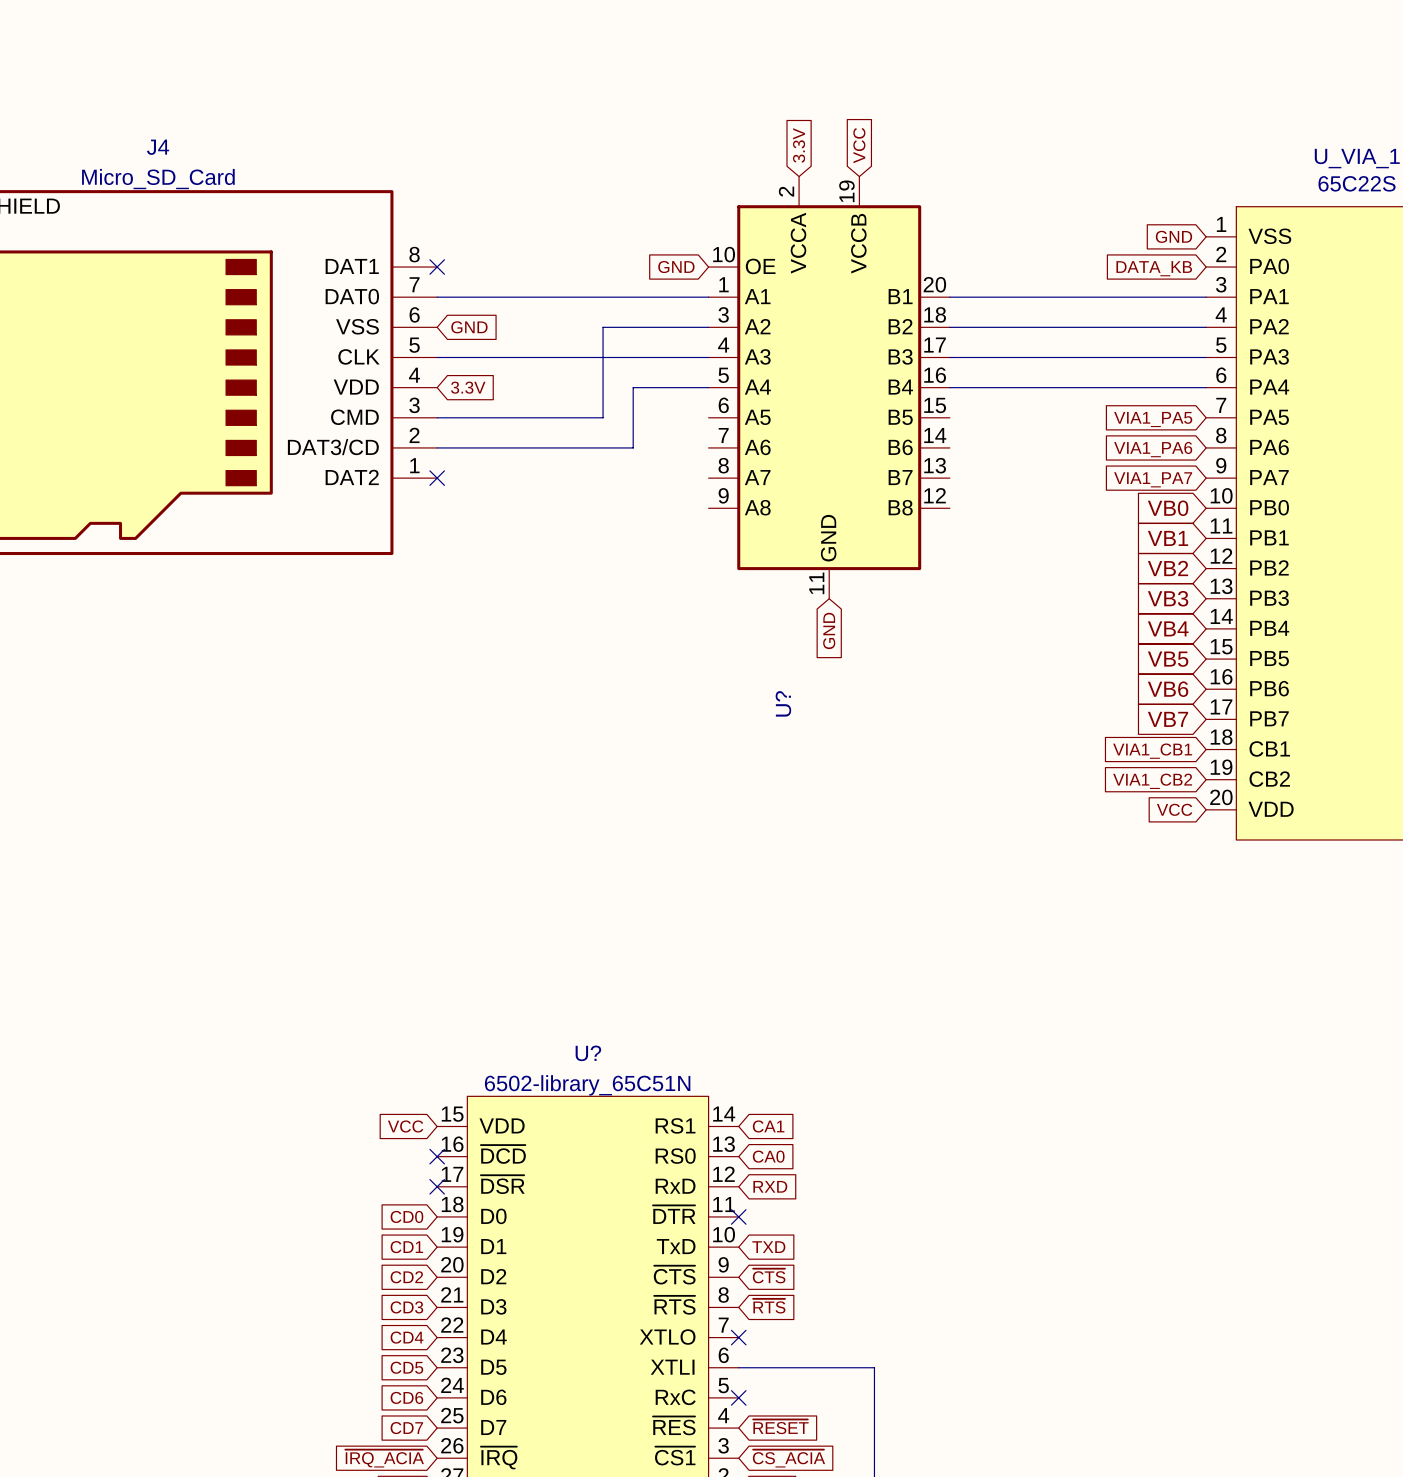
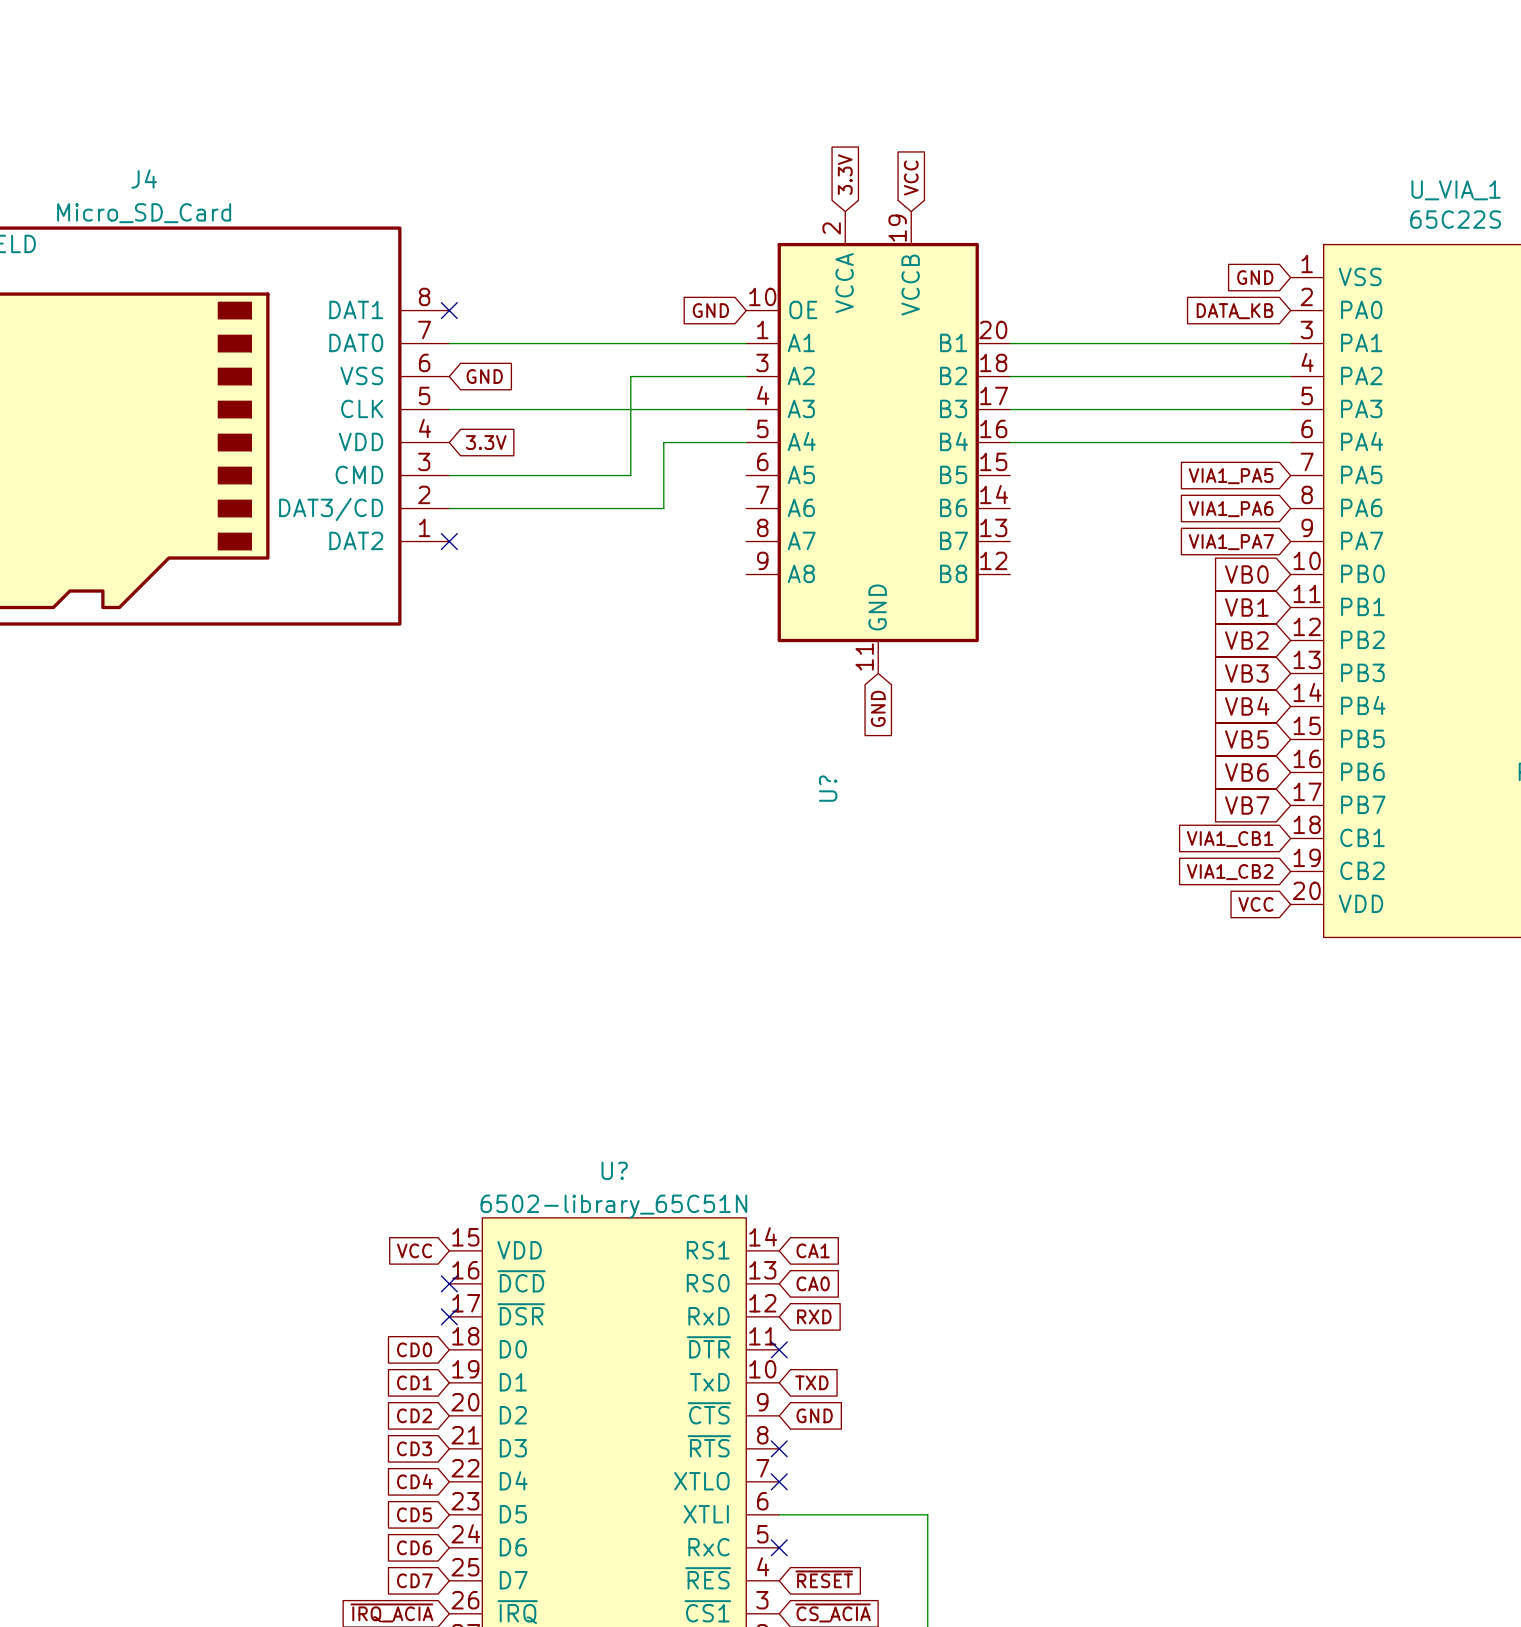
global label: ~{CTS} (769, 1276) -> GND (814, 1415)
global label: ~{RTS} (769, 1306) -> none
no-connect mark: none -> (779, 1448)

